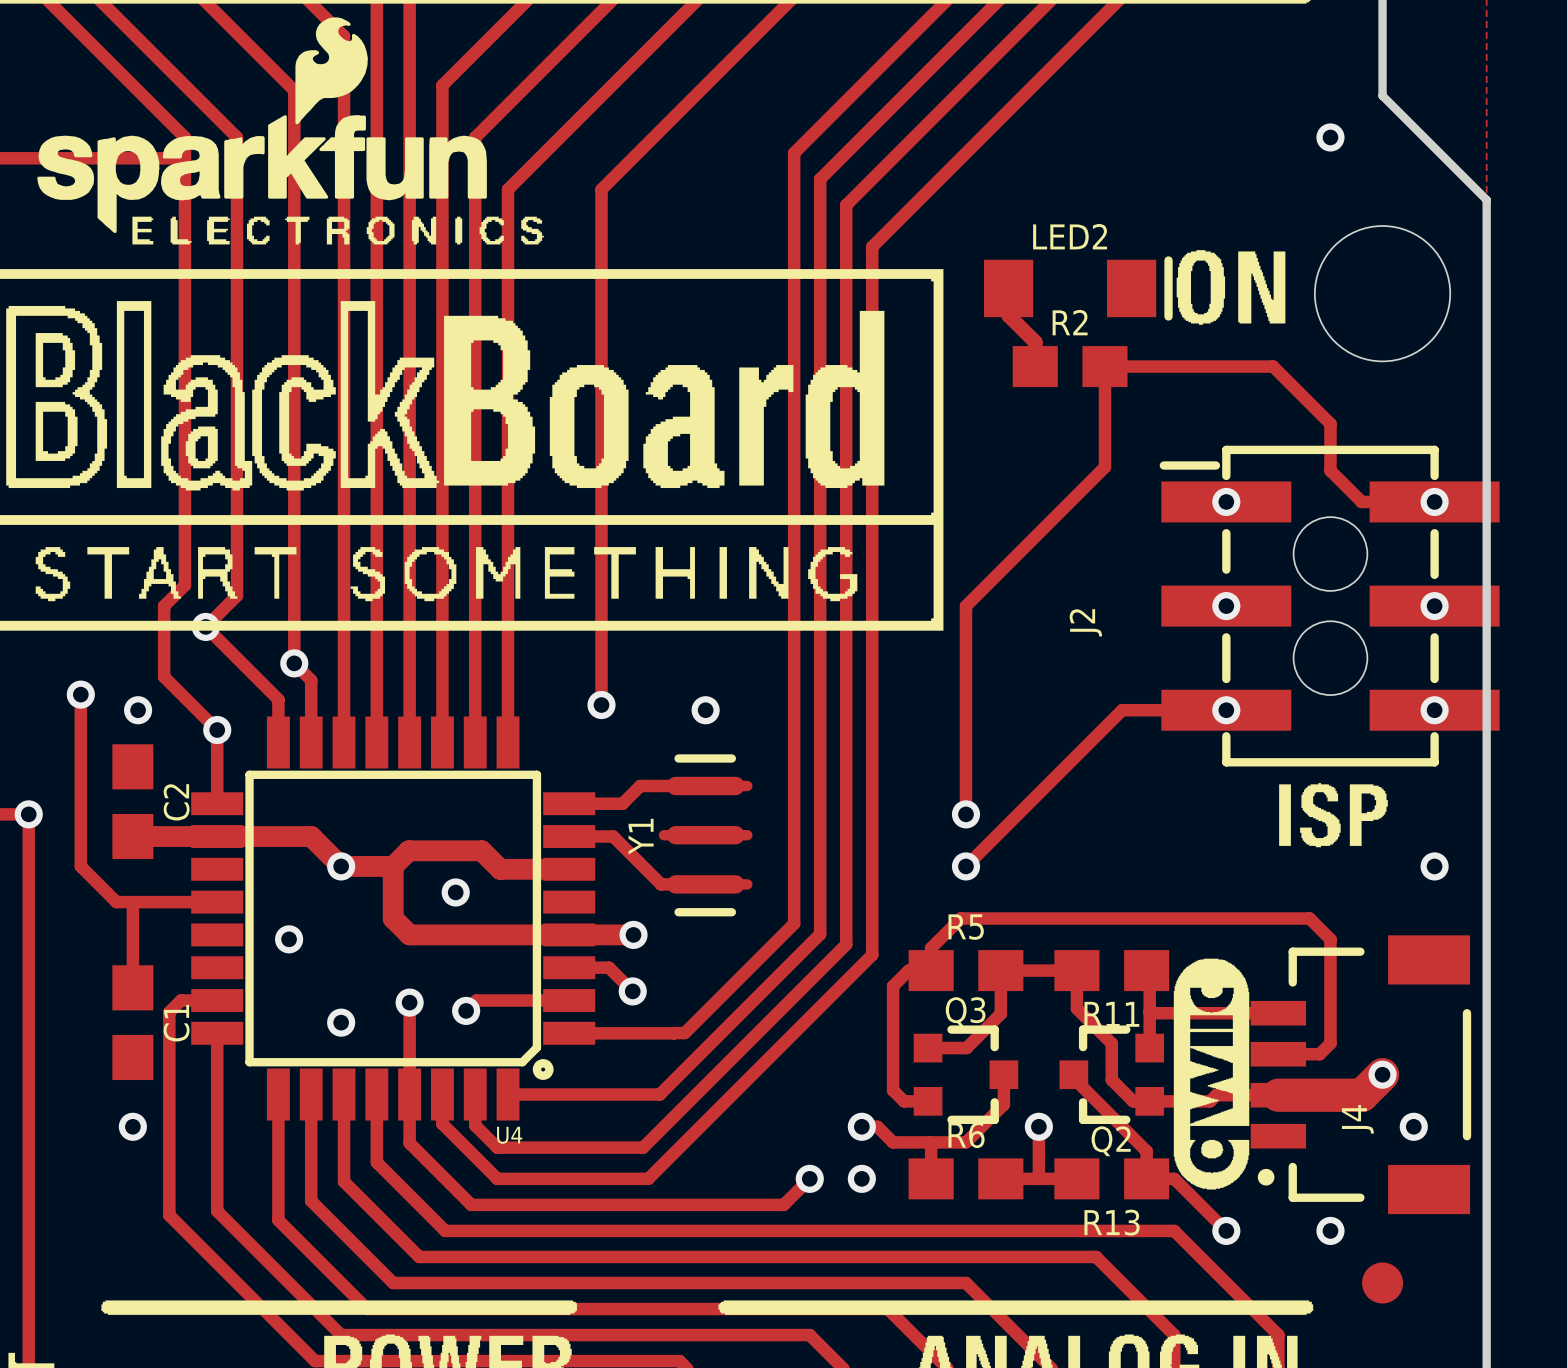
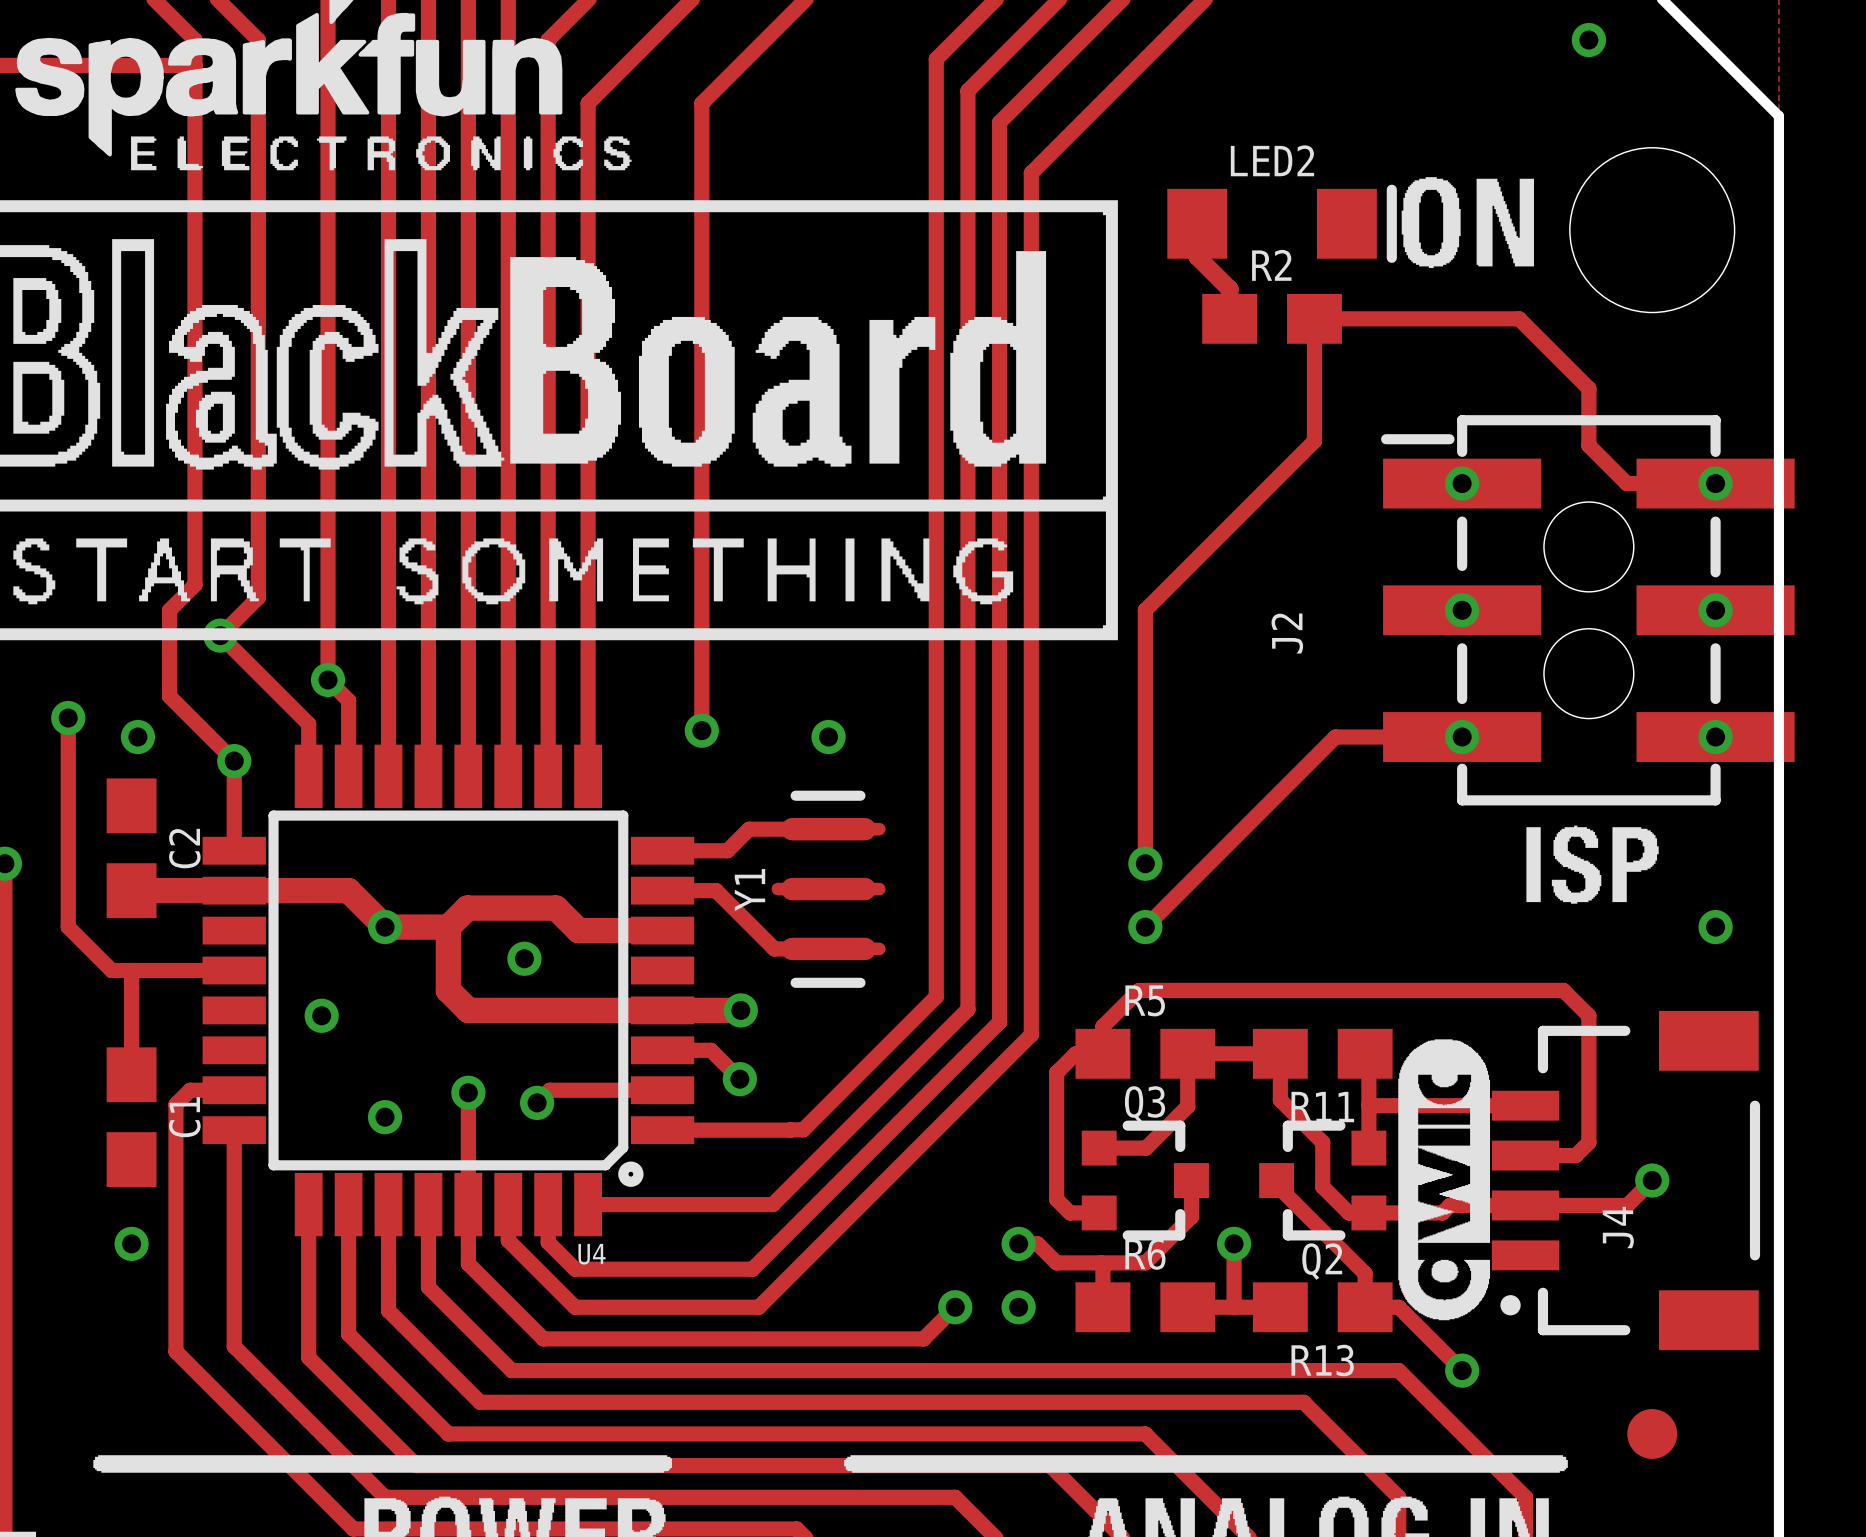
track width: thick (1382, 1074) (1362, 1095) (1278, 1095) -> thin (1652, 1180) (1627, 1205) (1525, 1205)
via: (1413, 1126) -> none
via: (1330, 1230) -> none

